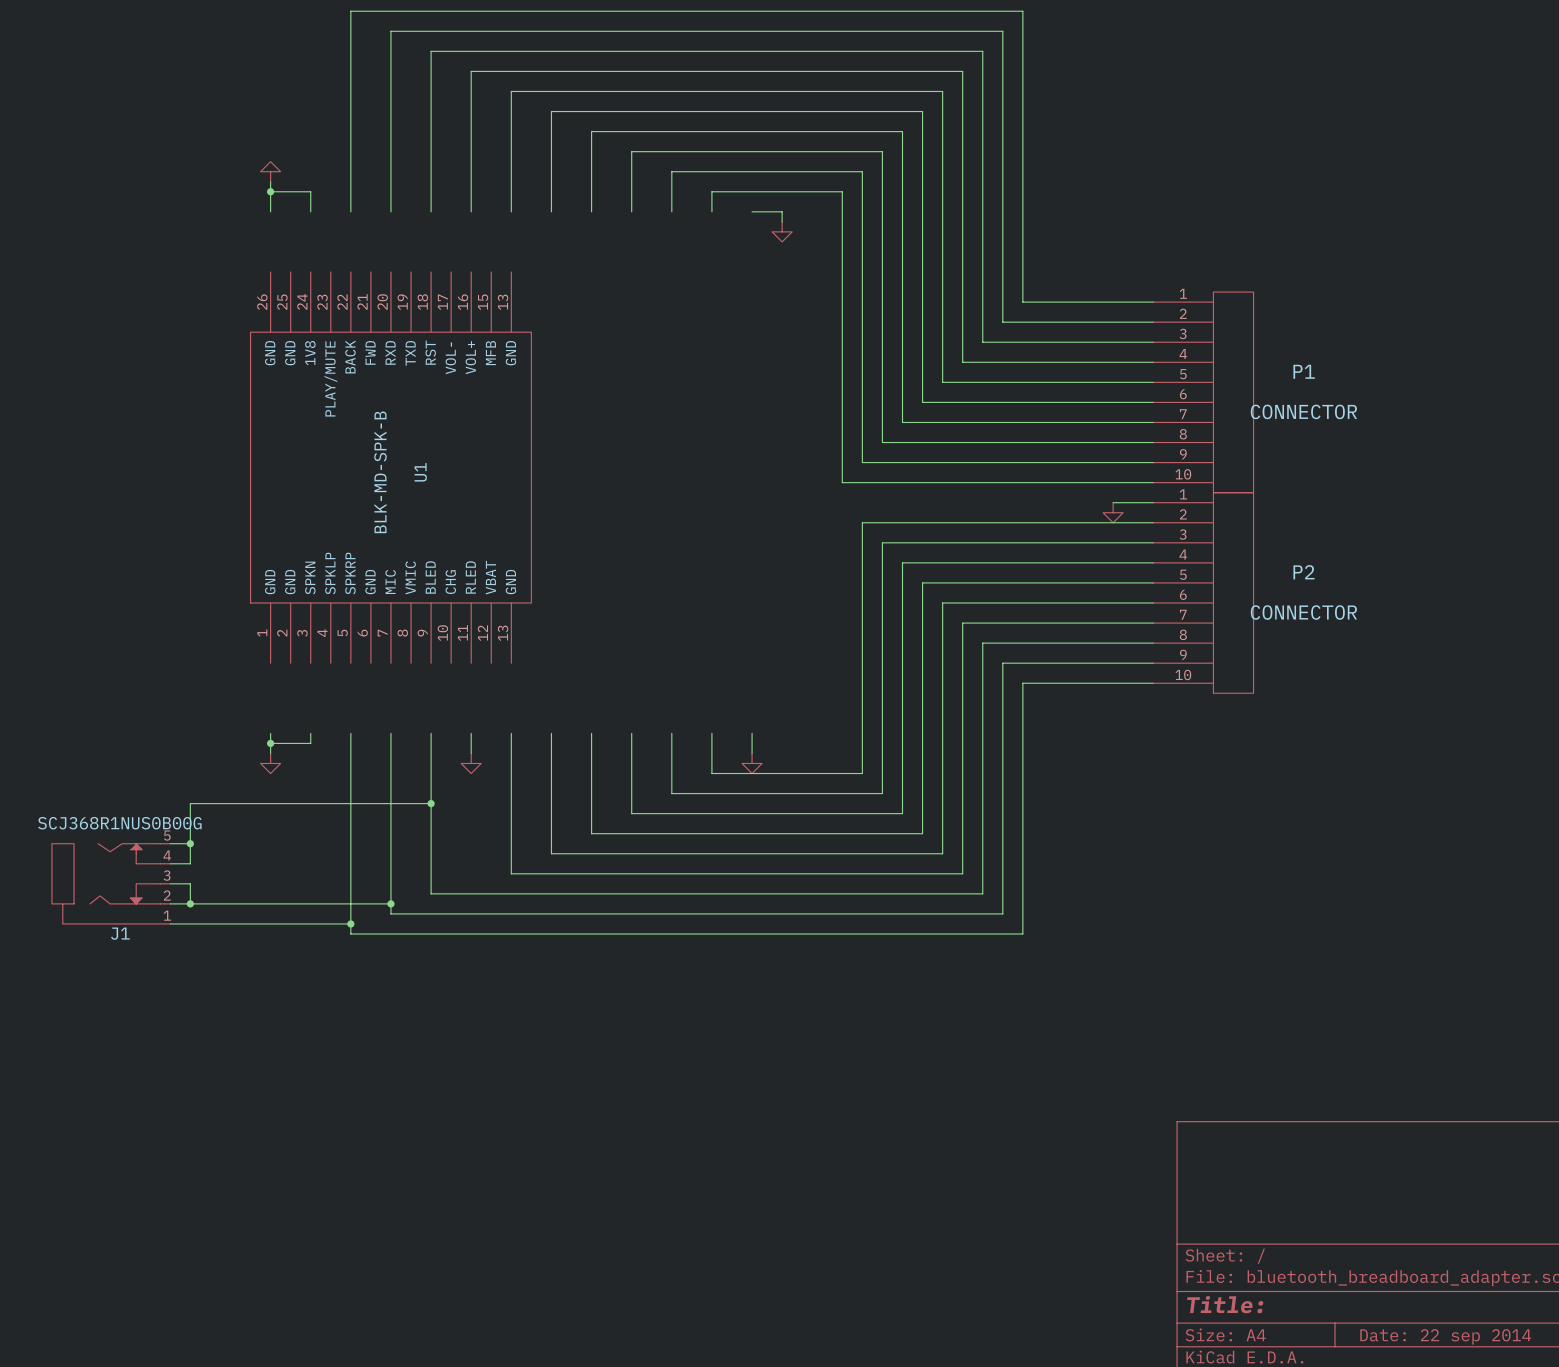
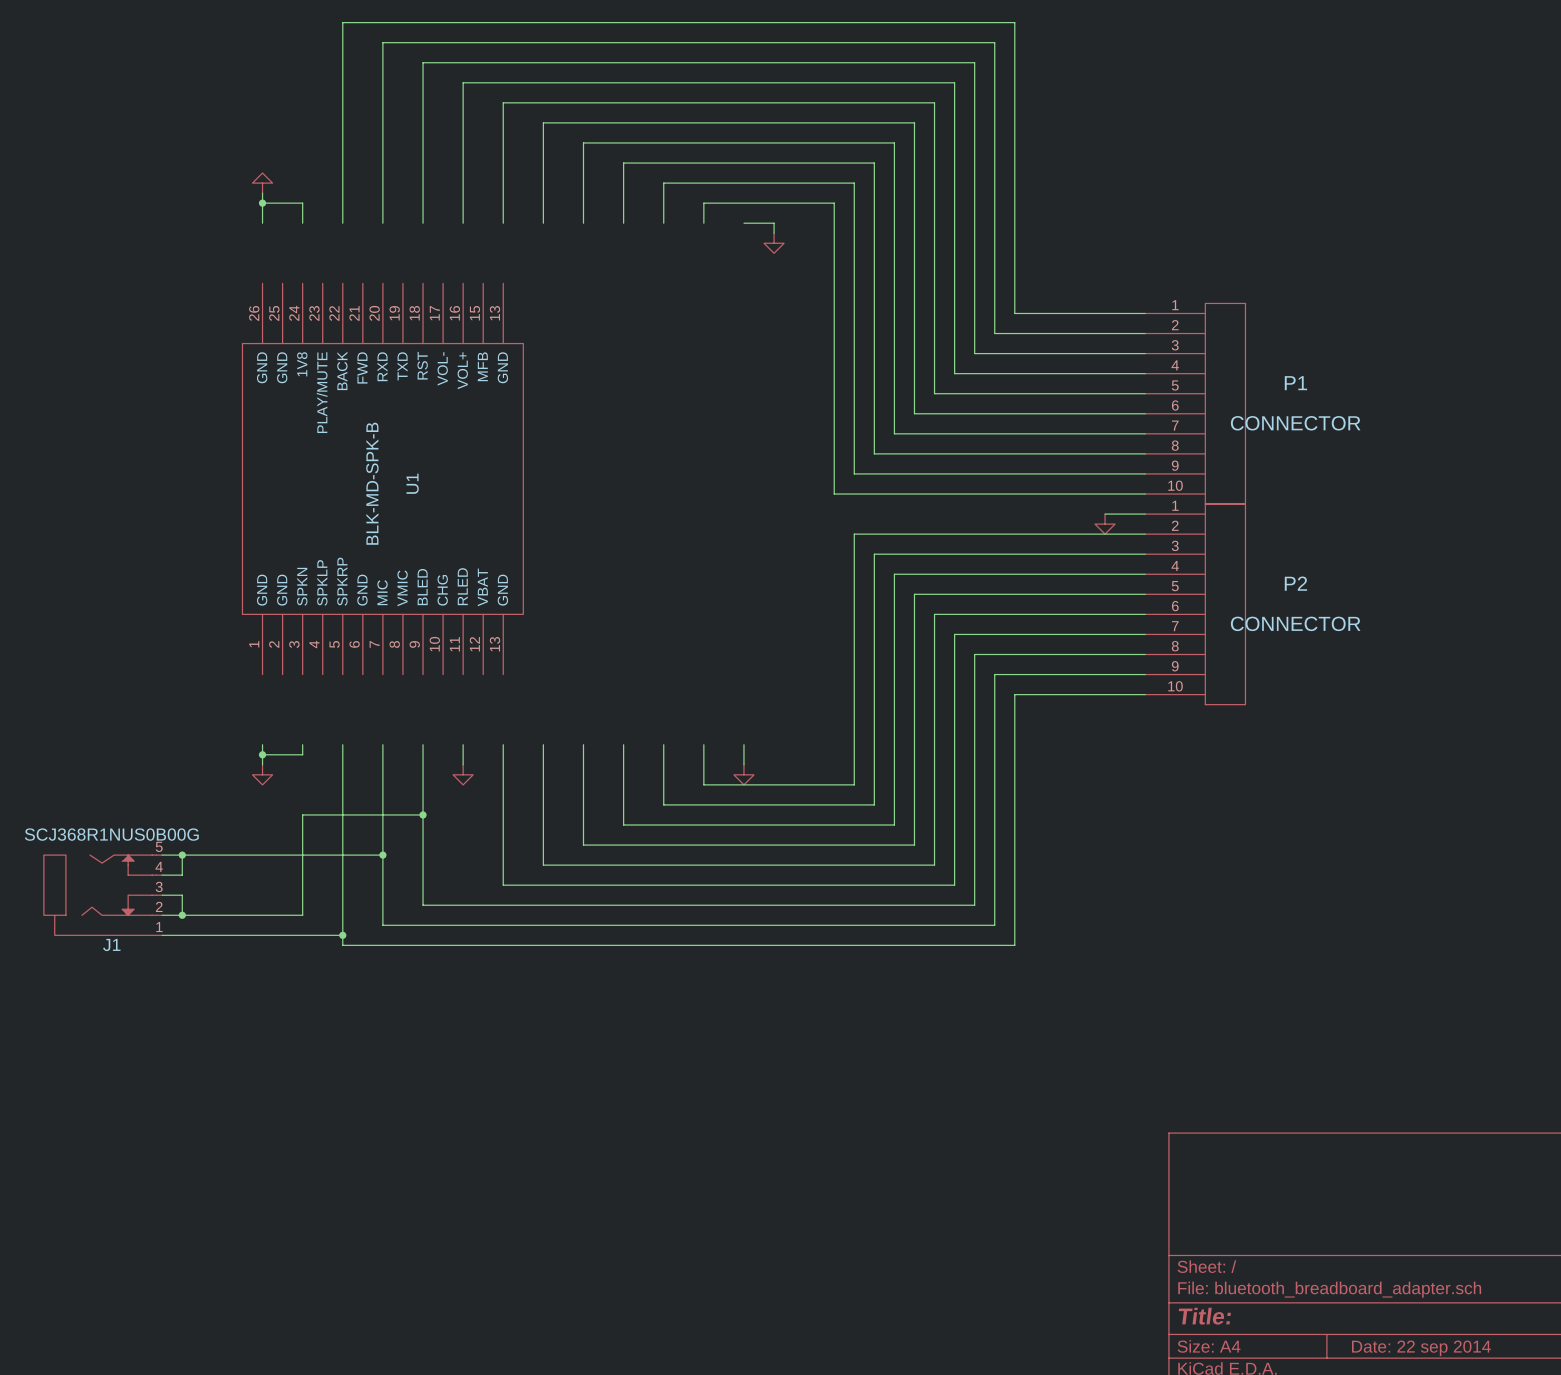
wire: (310, 803) (190, 803) (190, 843) -> (382, 855) (182, 855)
junction: none -> (382, 855)
wire: (310, 903) (390, 903) -> (302, 915) (302, 814)
junction: (390, 903) -> none

